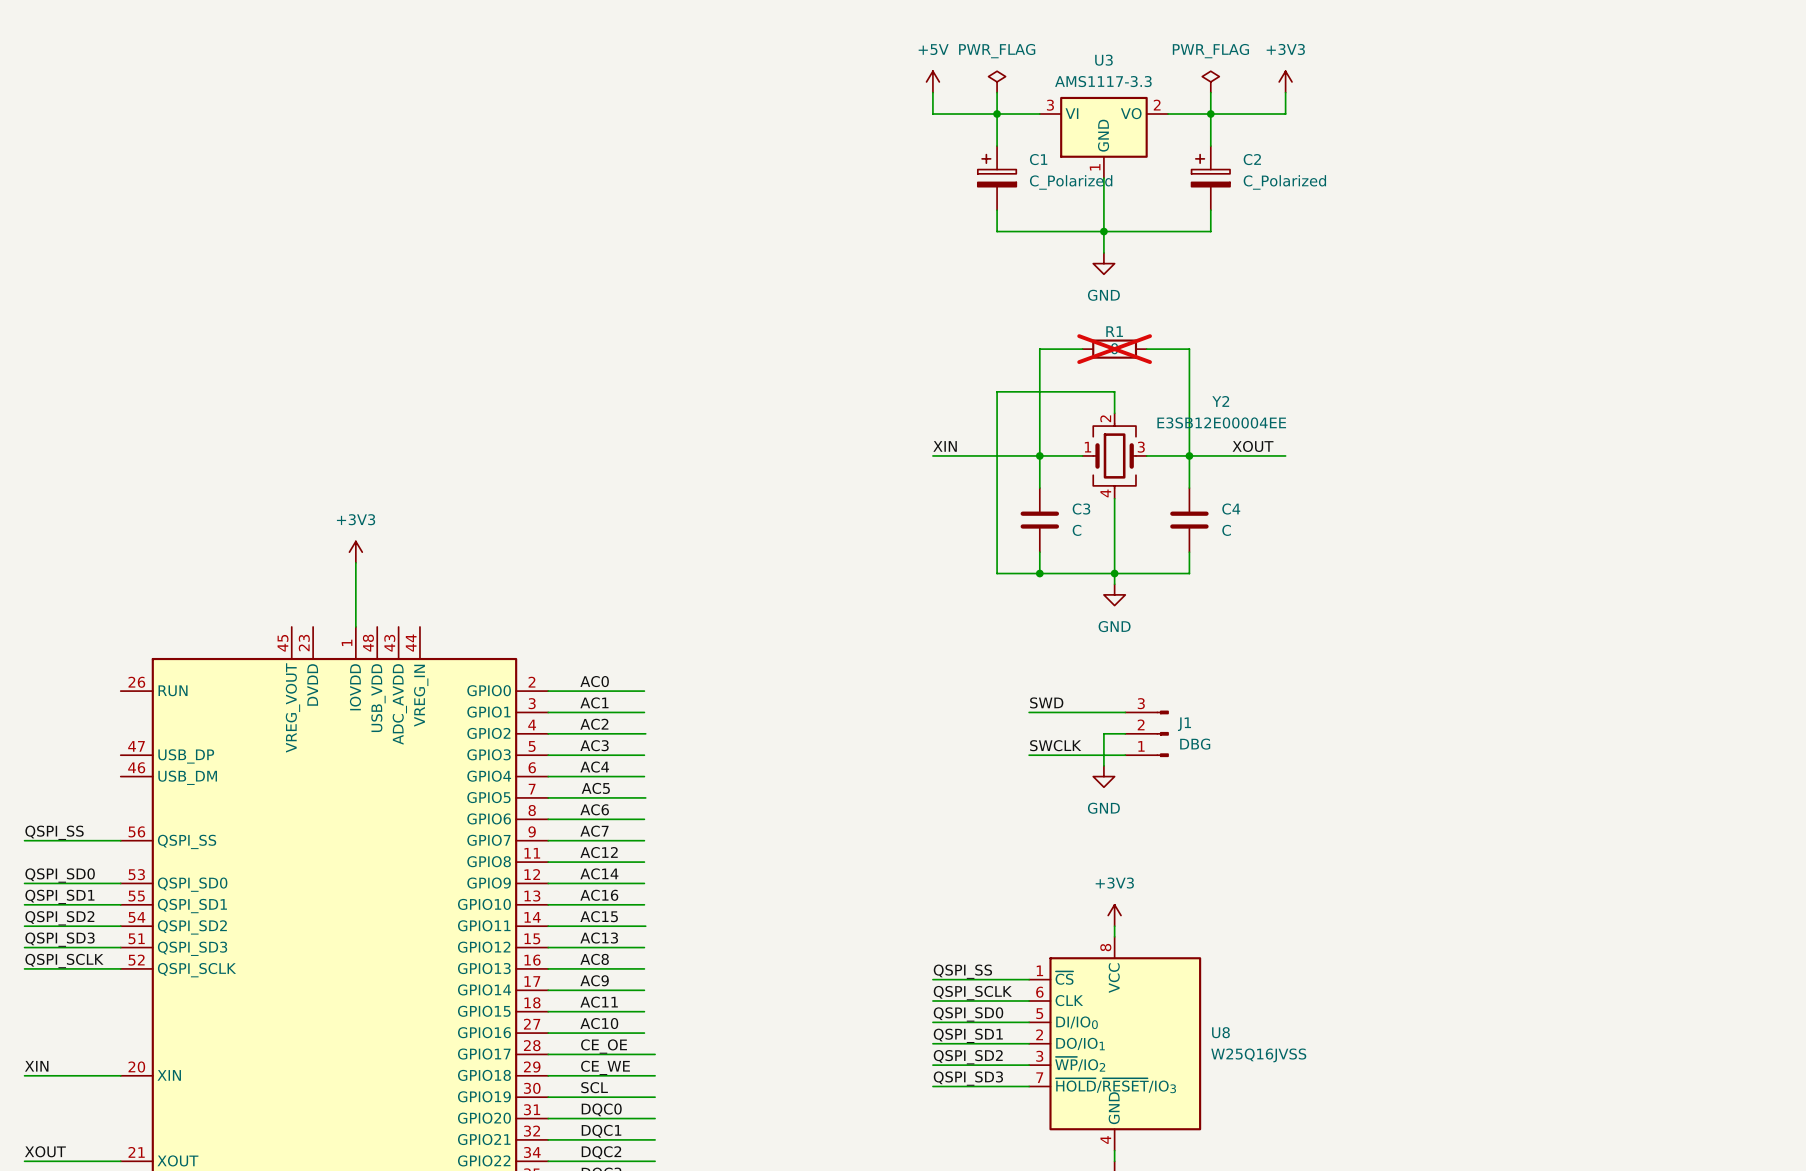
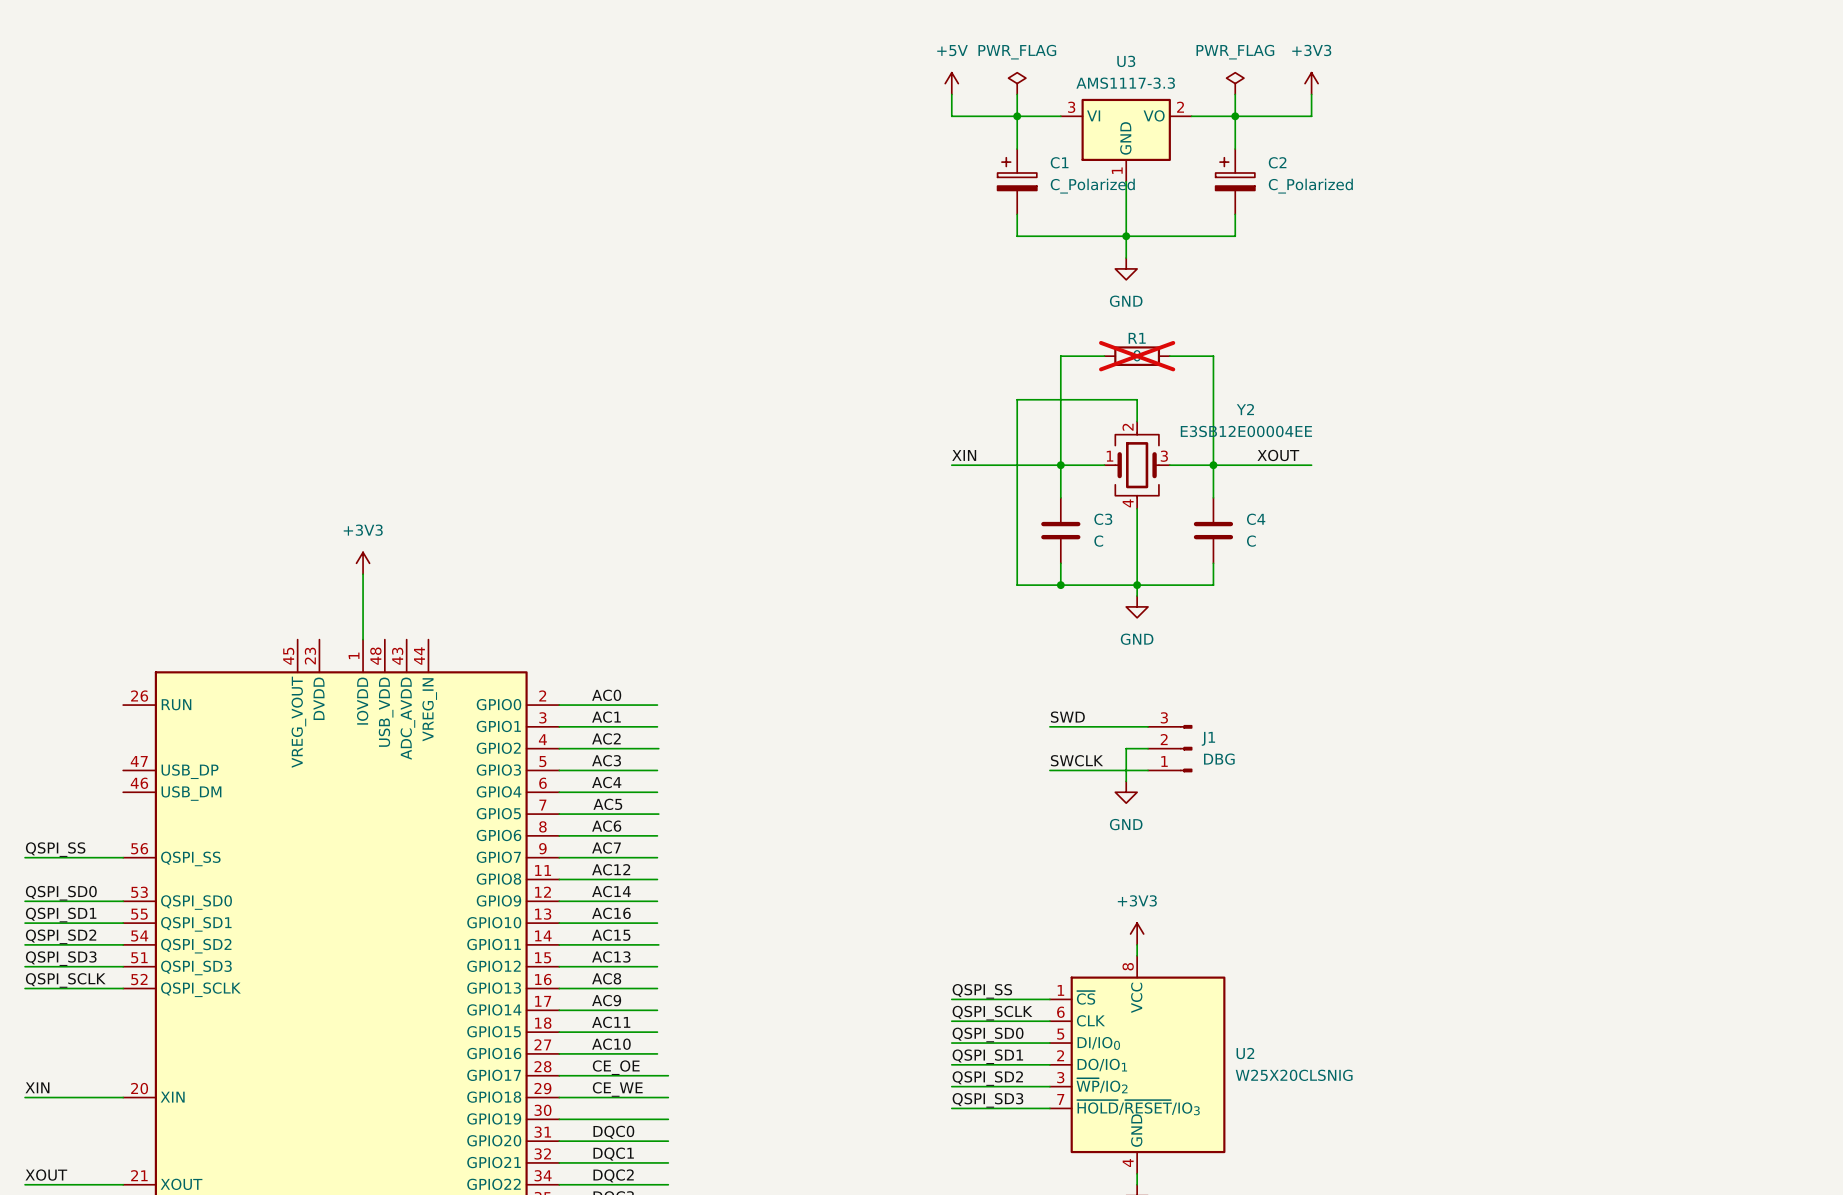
U8 name: U8 (1220, 1032) -> U2 (1245, 1053)
U8 value: W25Q16JVSS (1258, 1055) -> W25X20CLSNIG (1294, 1075)
label: SCL (594, 1087) -> none

